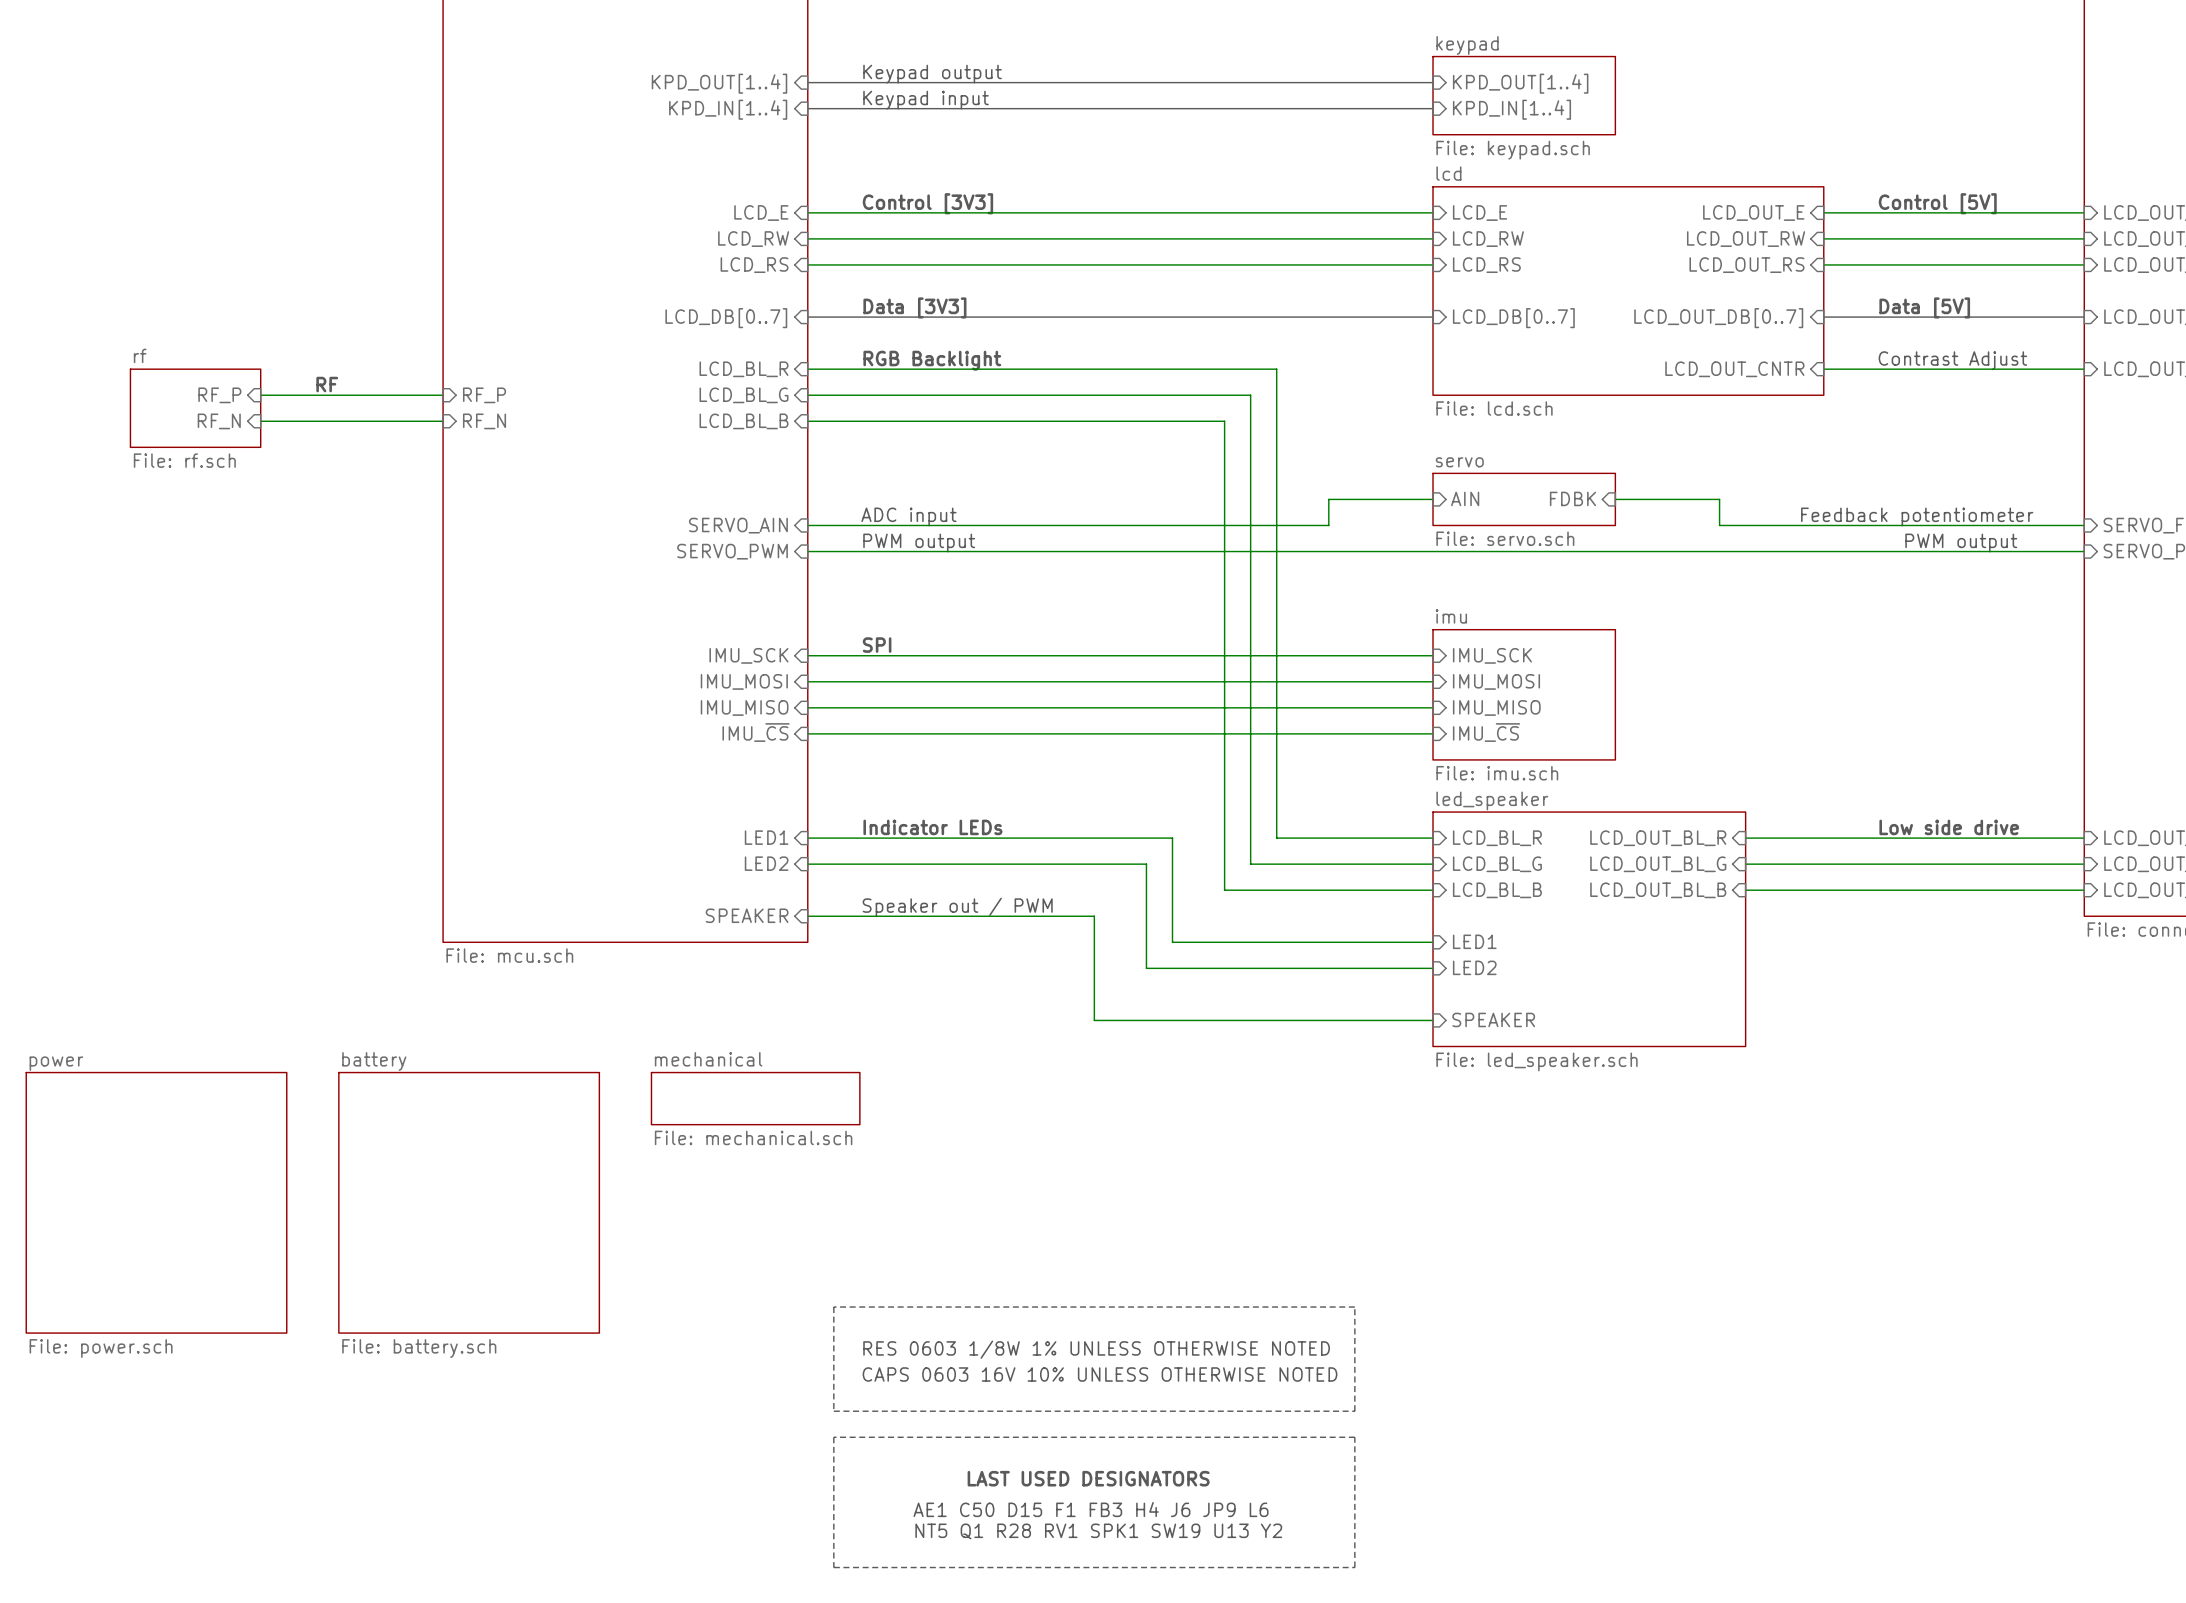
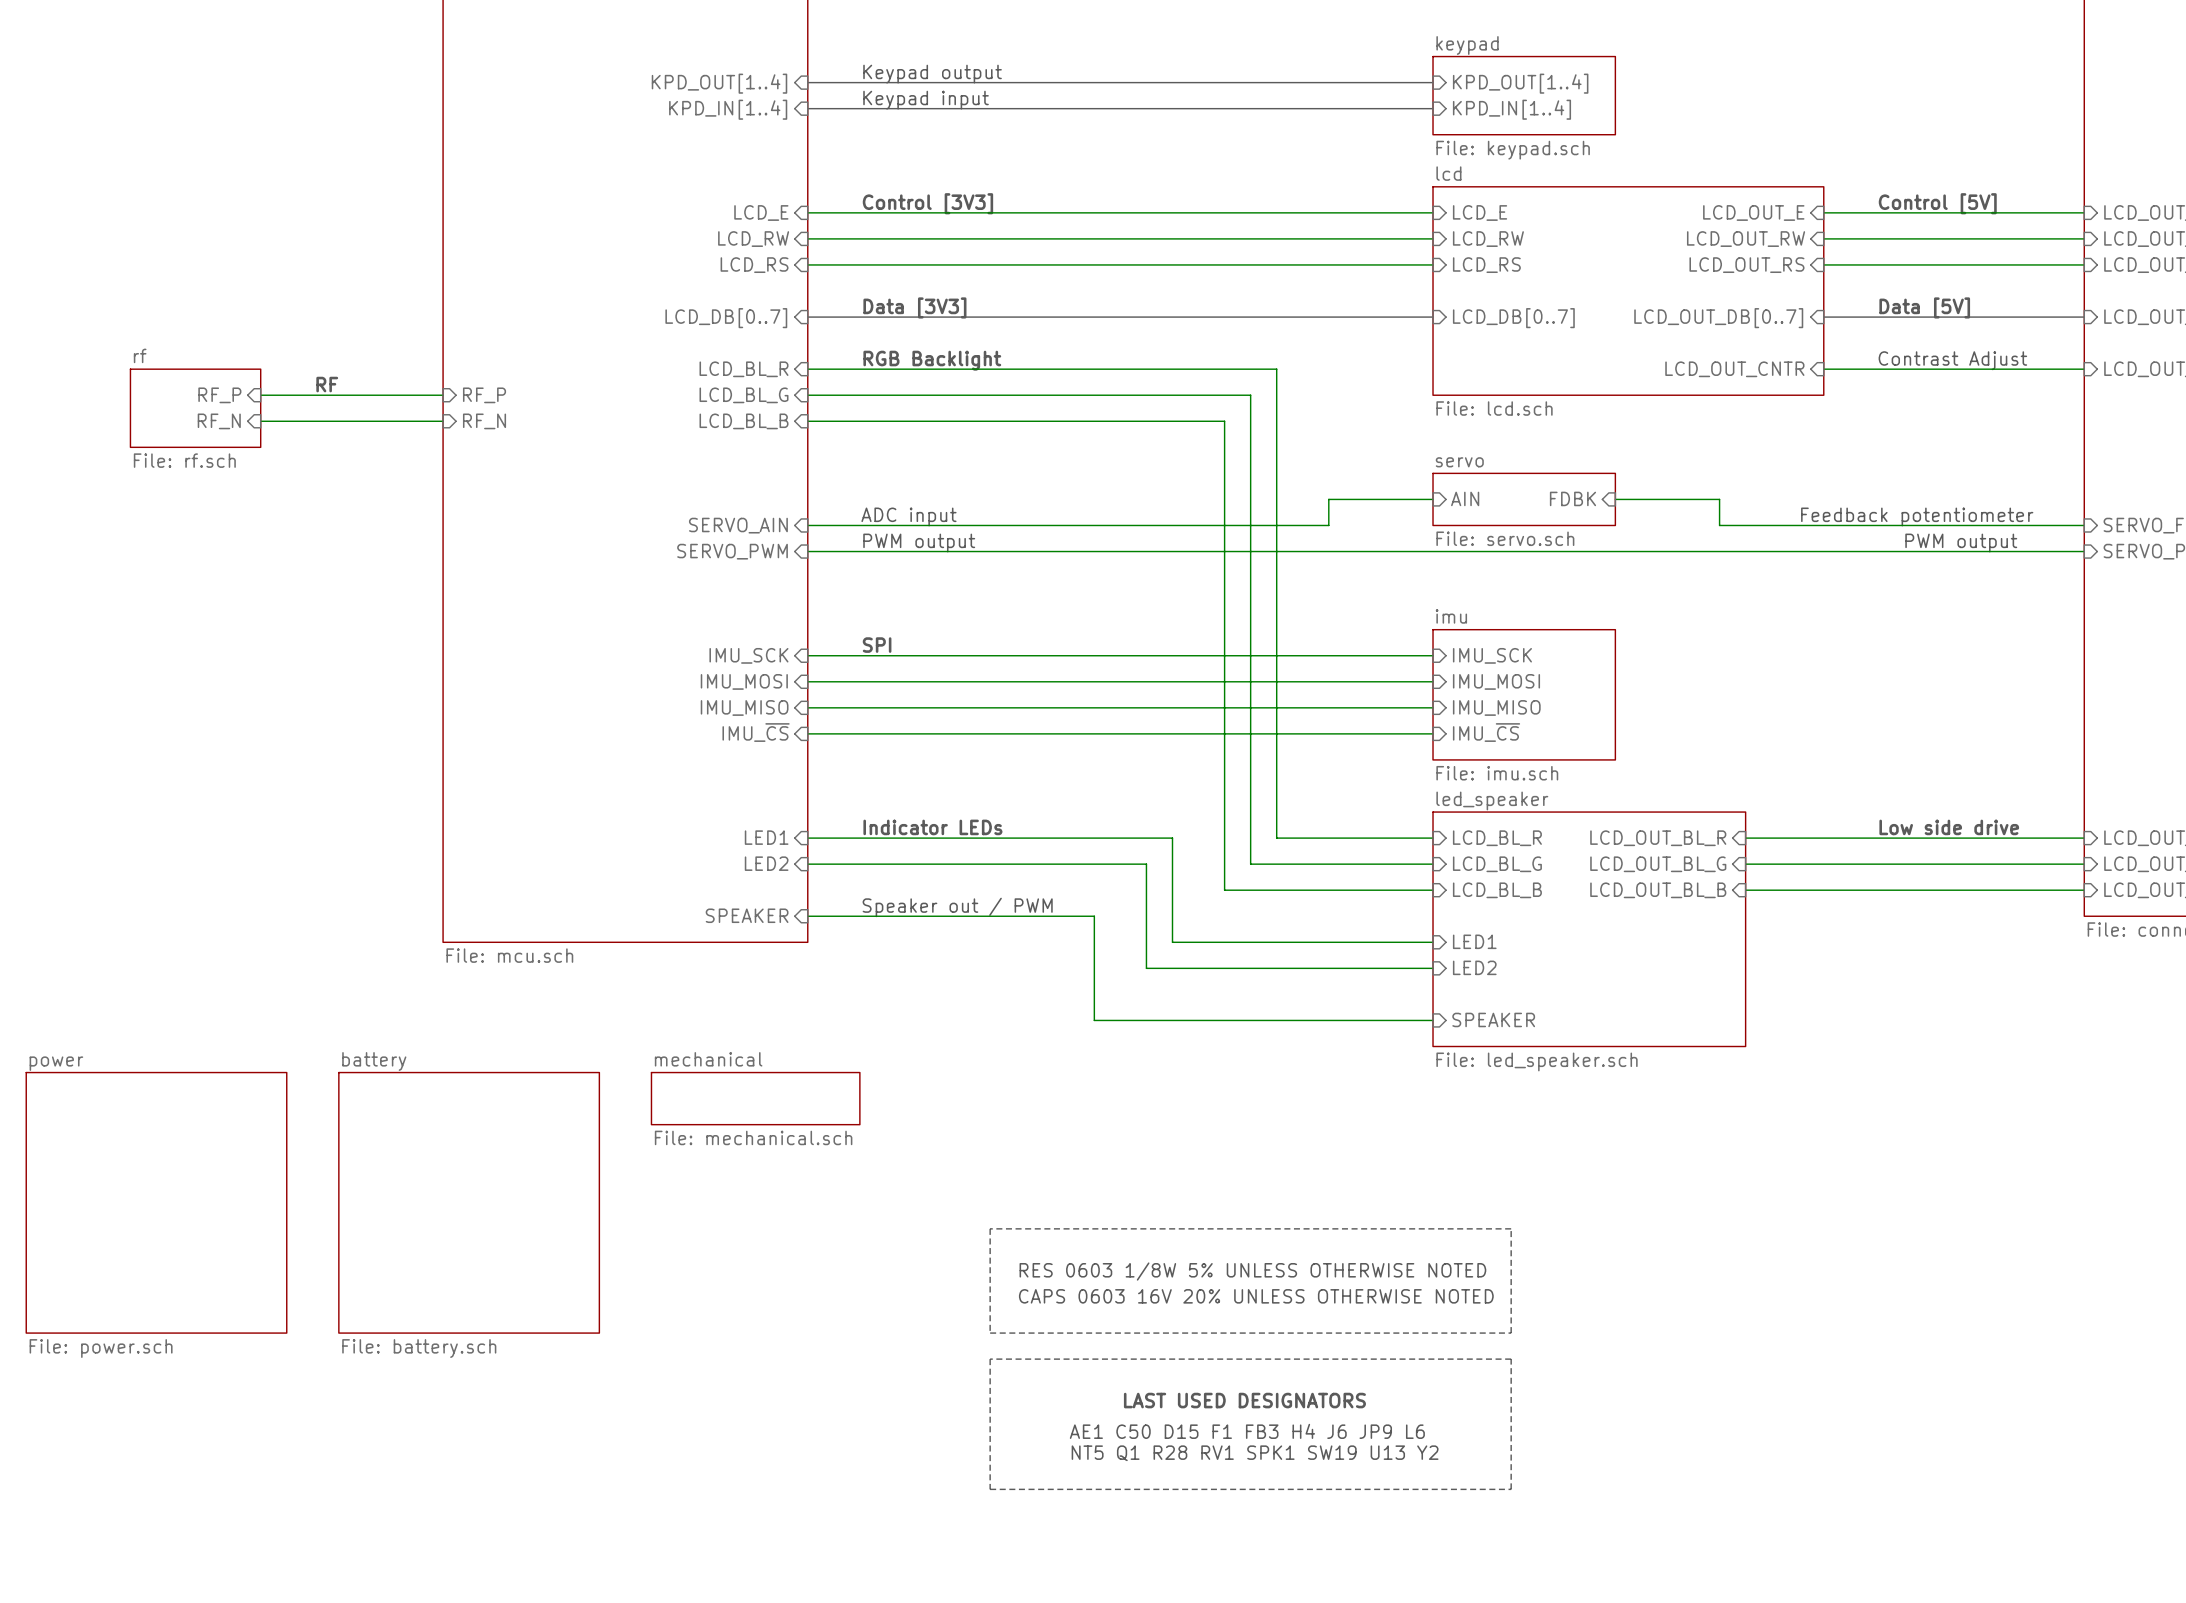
text: none -> RES 0603 1/8W 5% UNLESS OTHERWISE NOTED (1252, 1271)
text: none -> CAPS 0603 16V 20% UNLESS OTHERWISE NOTED (1256, 1296)
line: (833, 1307) (833, 1411) (1354, 1411) (1354, 1307) (833, 1307) -> (990, 1228) (990, 1333) (1511, 1333) (1511, 1228) (990, 1228)
text: RES 0603 1/8W 1% UNLESS OTHERWISE NOTED (1096, 1349) -> none
text: CAPS 0603 16V 10% UNLESS OTHERWISE NOTED (1100, 1374) -> none
line: (833, 1437) (833, 1567) (1354, 1567) (1354, 1437) (833, 1437) -> (990, 1359) (990, 1489) (1511, 1489) (1511, 1359) (990, 1359)
text position: LAST USED DESIGNATORS (1088, 1478) -> LAST USED DESIGNATORS (1244, 1400)
text position: AE1 C50 D15 F1 FB3 H4 J6 JP9 L6 (1091, 1509) -> AE1 C50 D15 F1 FB3 H4 J6 JP9 L6 (1247, 1431)
text position: NT5 Q1 R28 RV1 SPK1 SW19 U13 Y2 (1098, 1531) -> NT5 Q1 R28 RV1 SPK1 SW19 U13 Y2 (1255, 1453)

